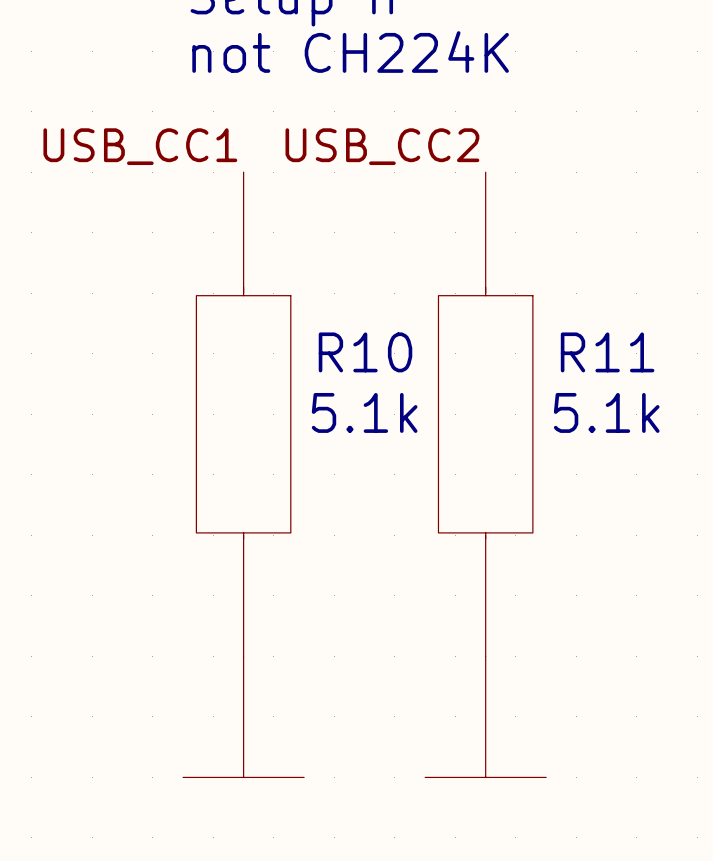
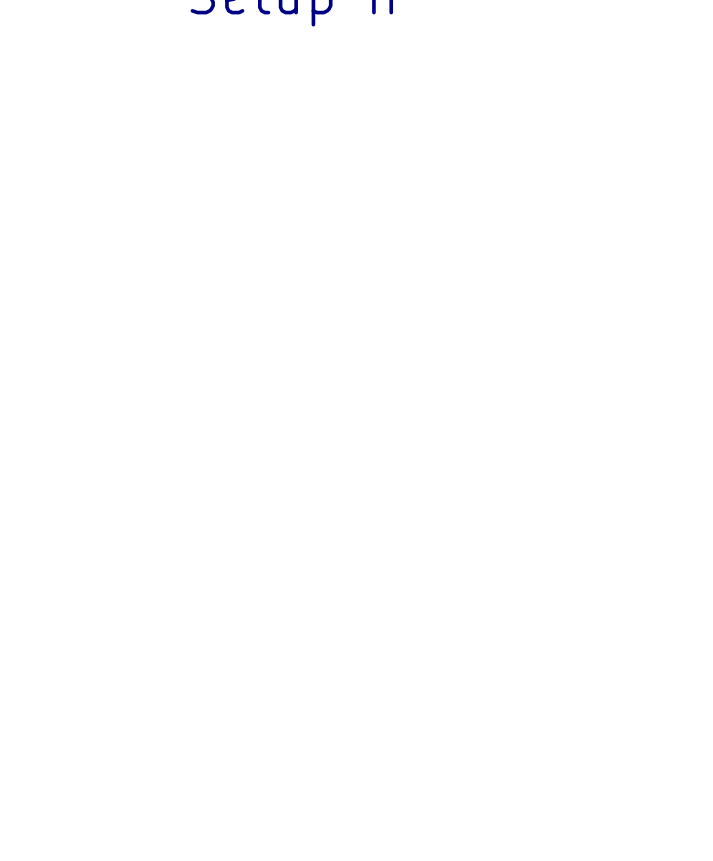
text: not CH224K (350, 52) -> none
label: USB_CC1 (140, 146) -> none
label: USB_CC2 (382, 146) -> none
R10: 5.1k (243, 414) -> none
R11: 5.1k (485, 414) -> none
power symbol: (243, 716) -> none
power symbol: (485, 716) -> none

